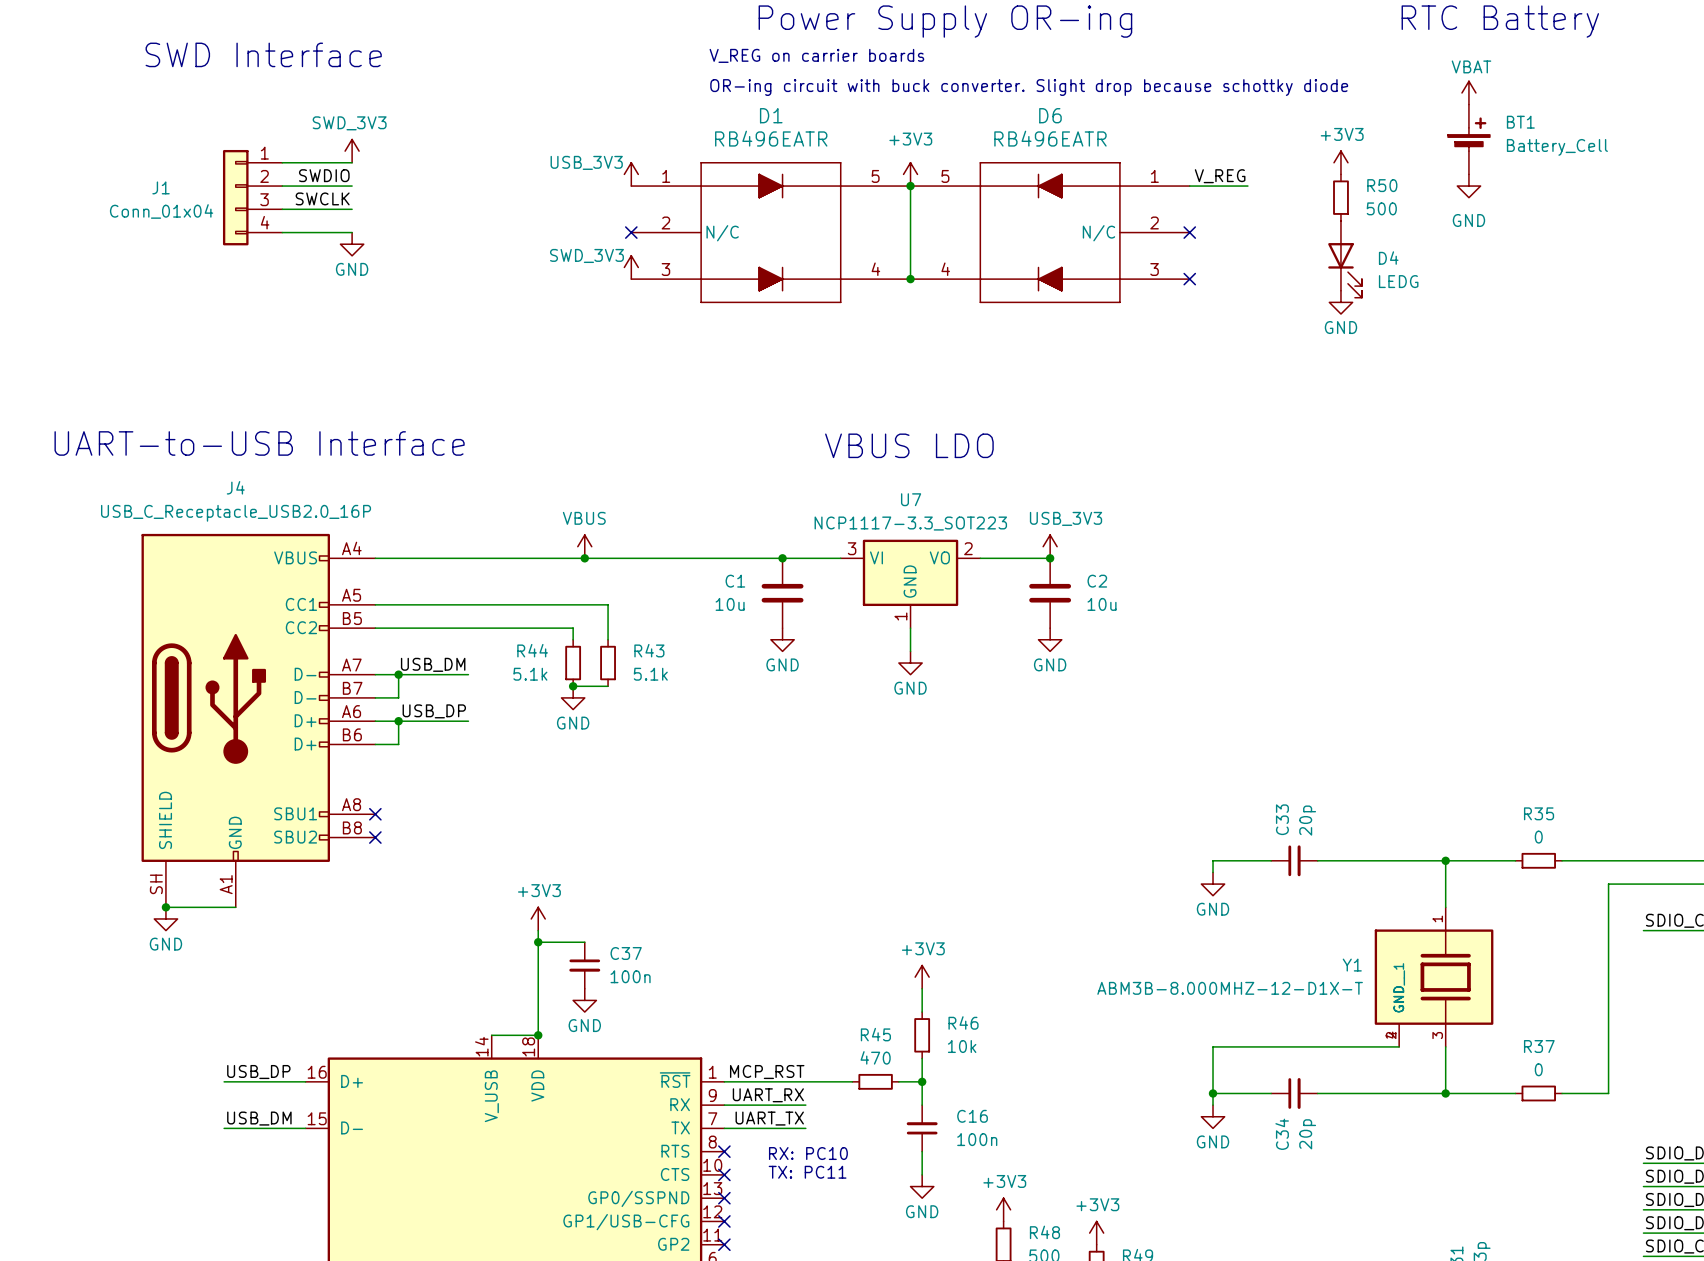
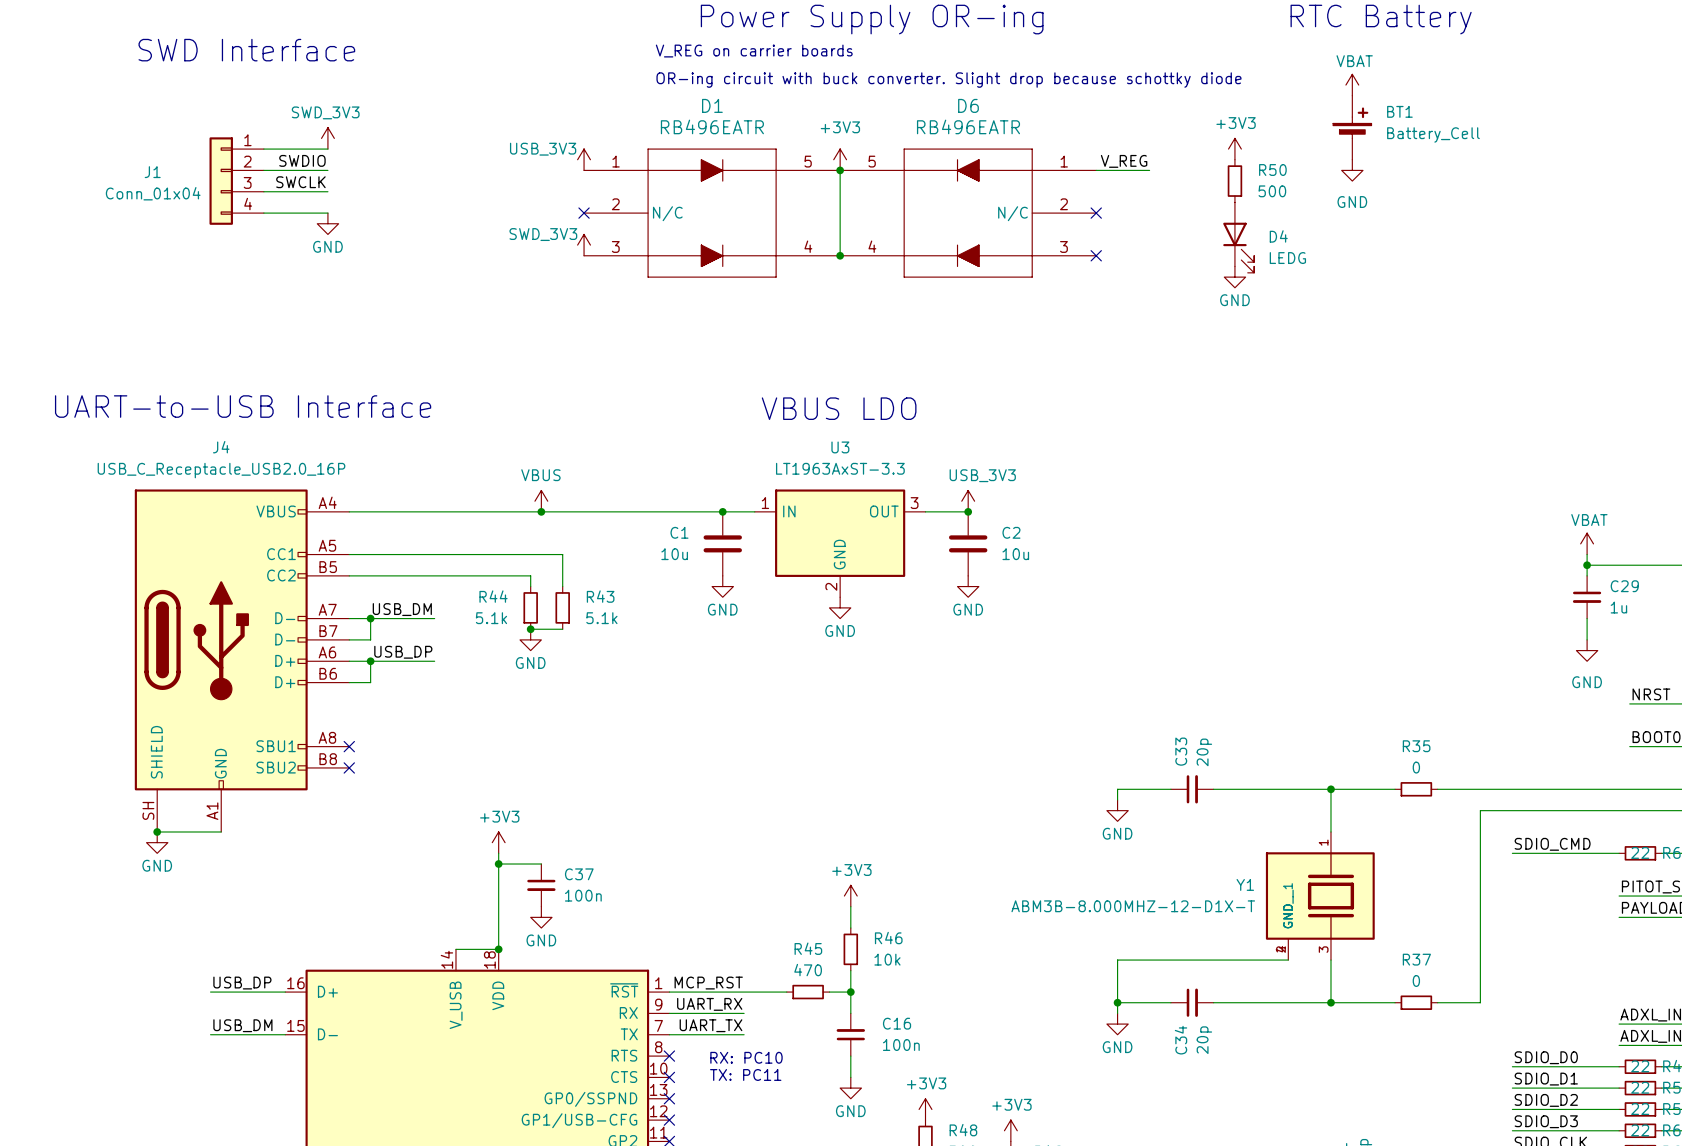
U7: NCP1117-3.3_SOT223 (910, 583) -> none
U3: none -> LT1963AxST-3.3 (840, 543)

